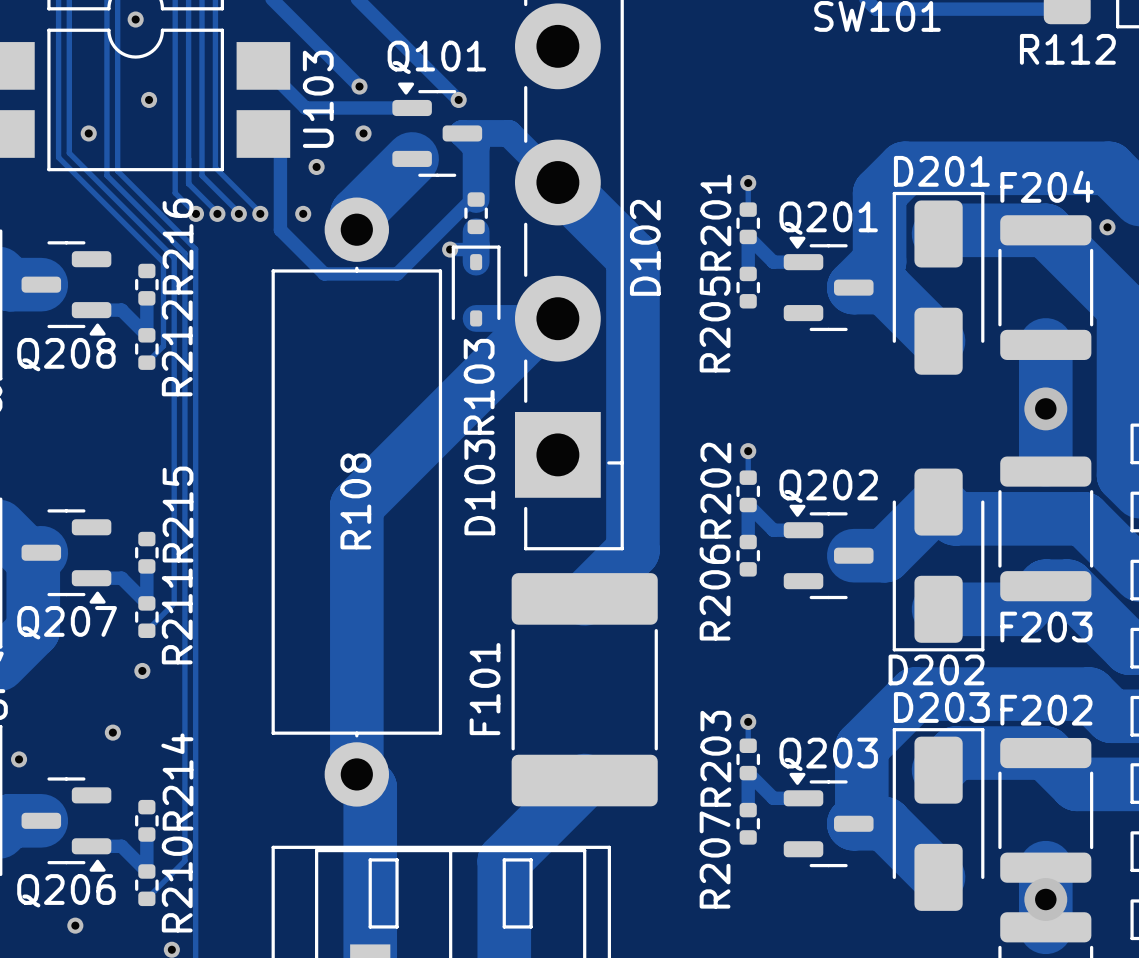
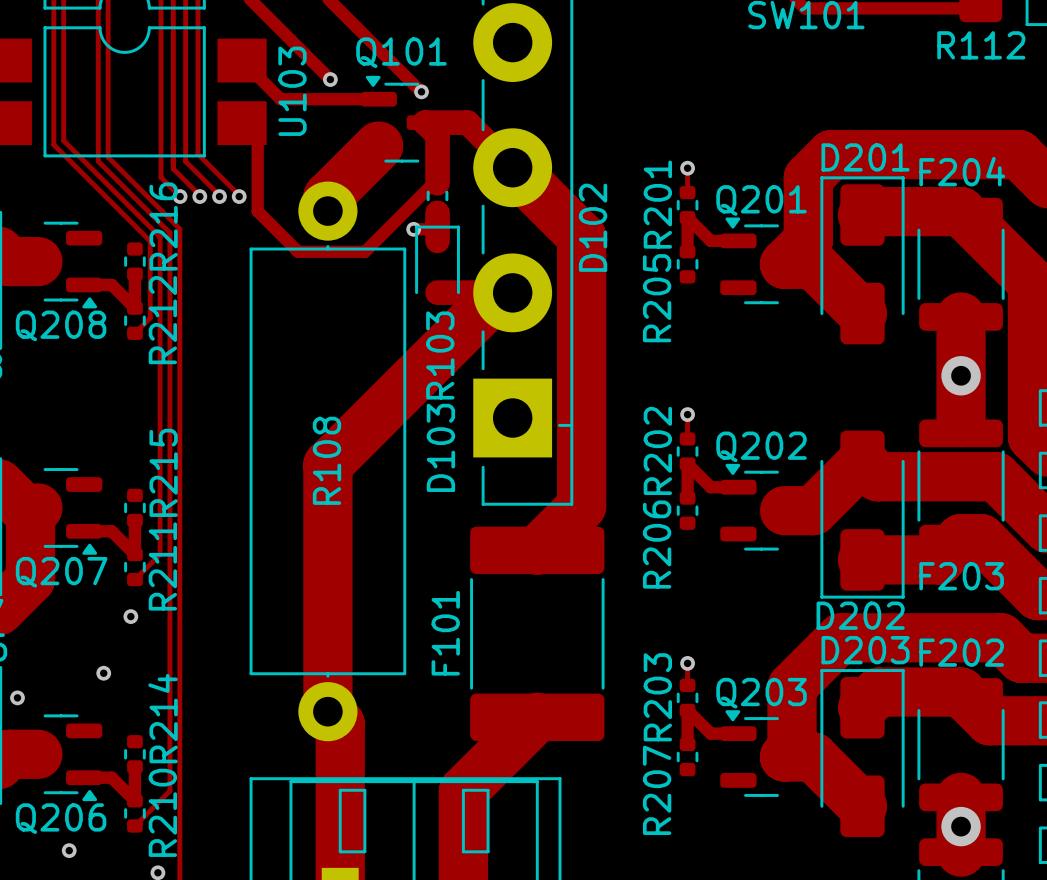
via: (135, 19) -> none
via: (149, 99) -> none
via: (88, 133) -> none
via: (363, 133) -> none
via: (316, 166) -> none
via: (303, 213) -> none
via: (1107, 227) -> none

